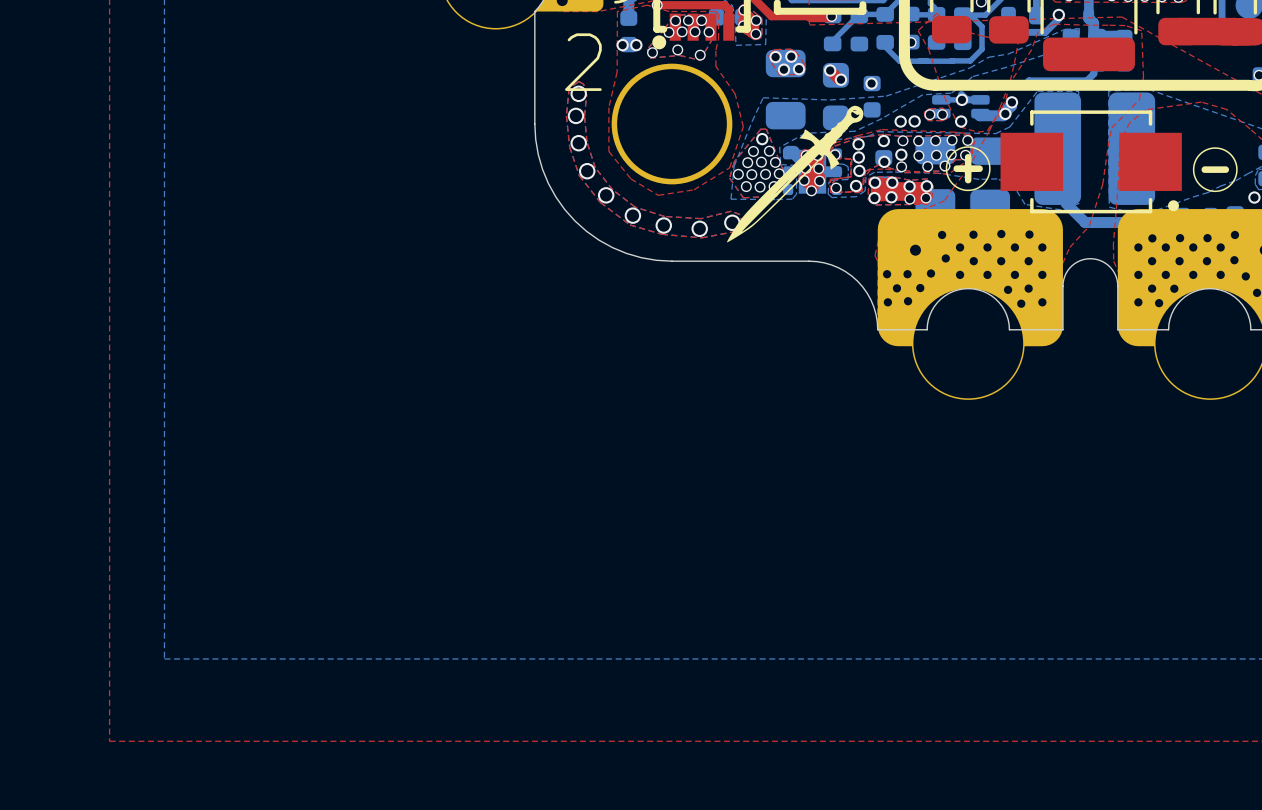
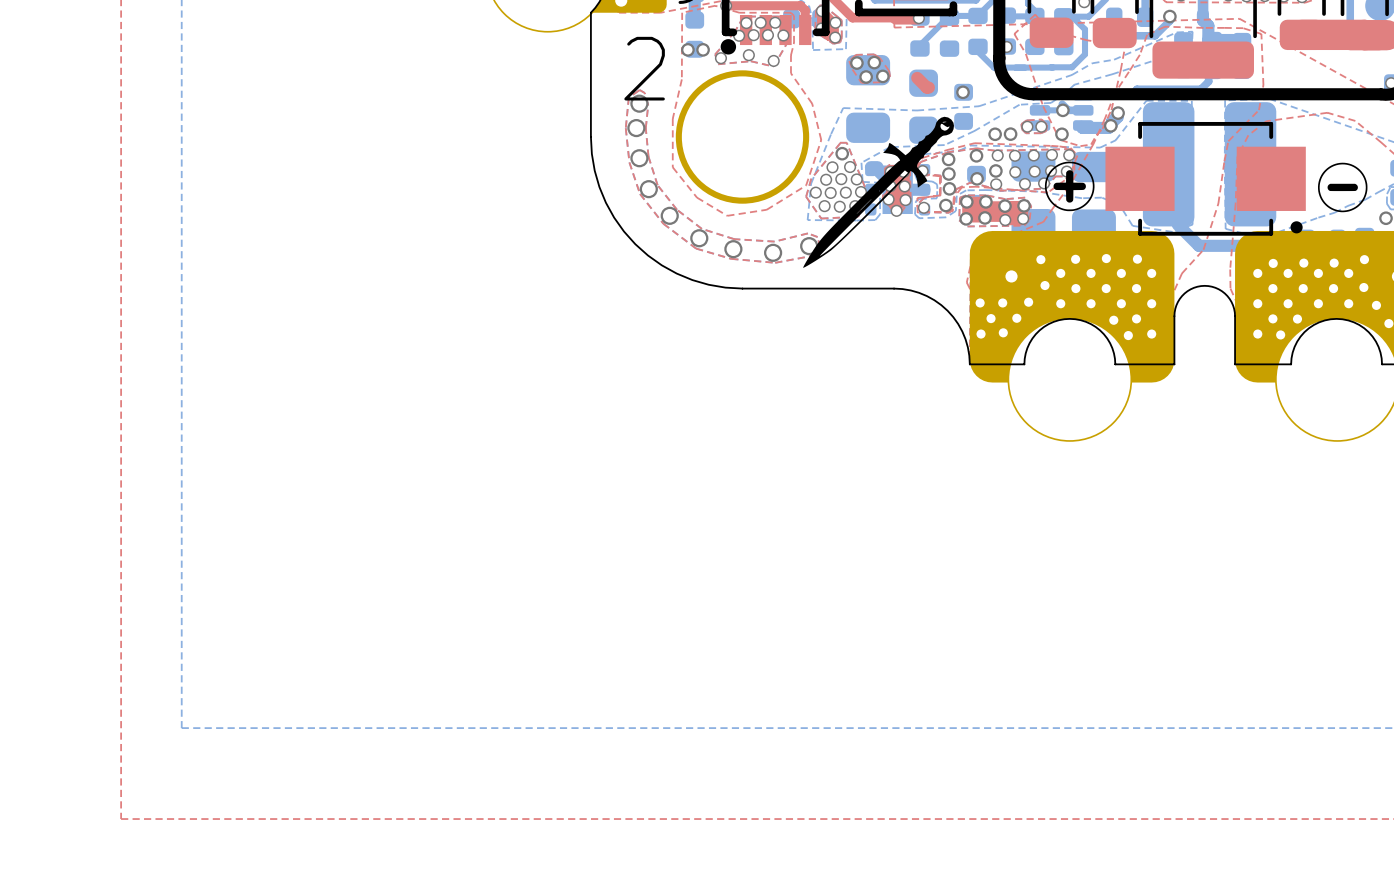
via: (830, 70) -> none
via: (841, 79) -> none

